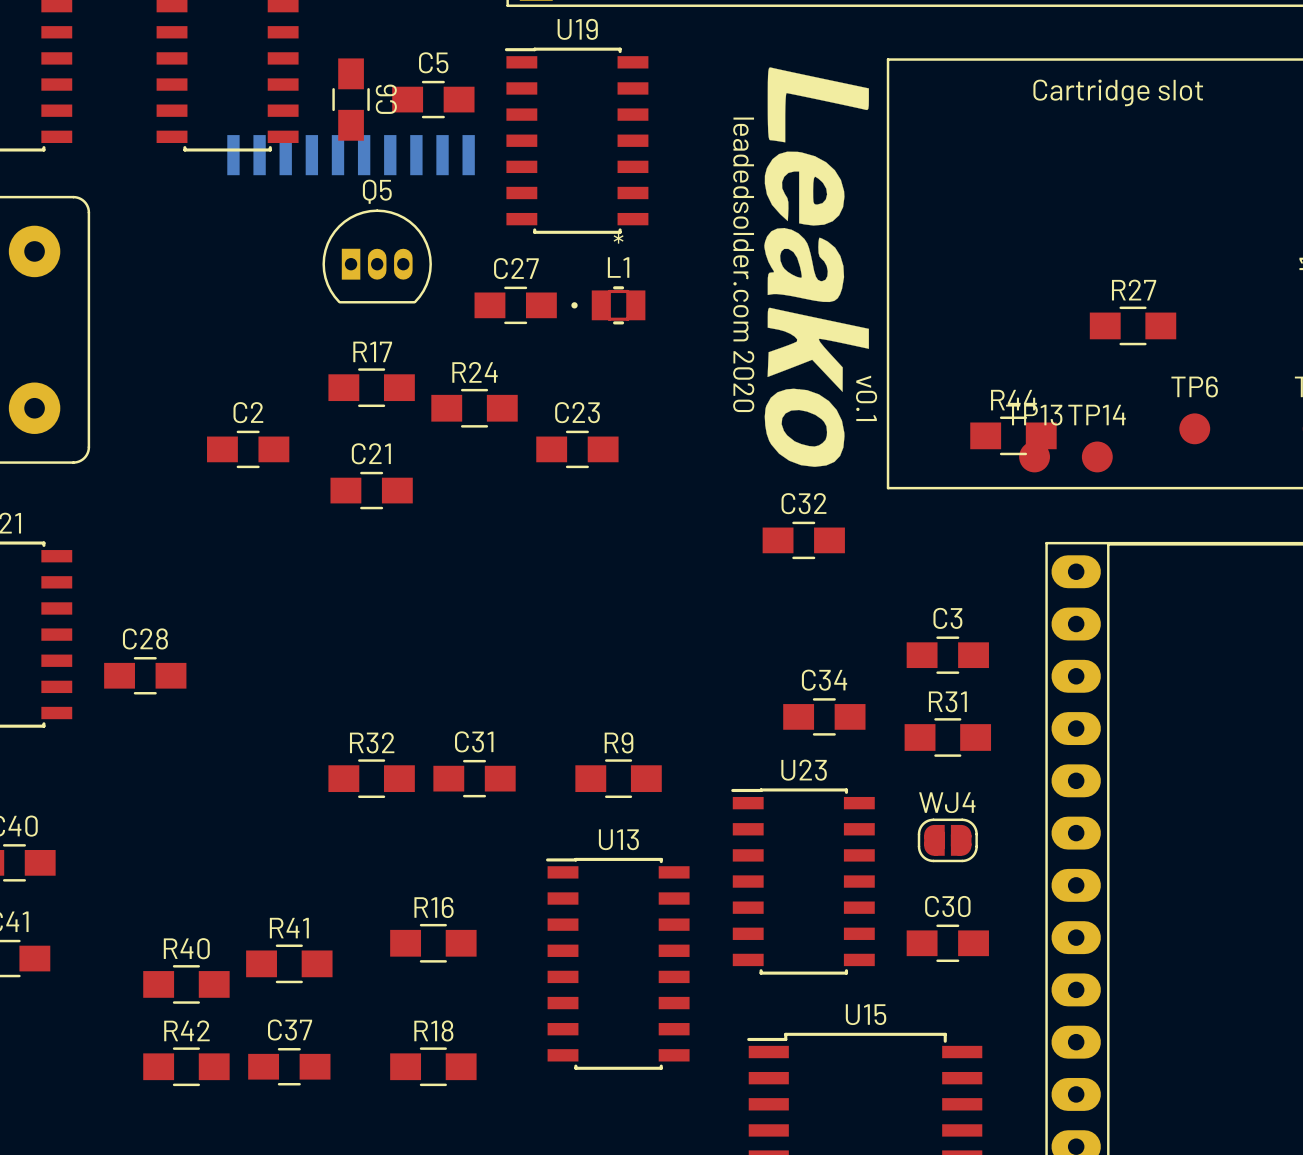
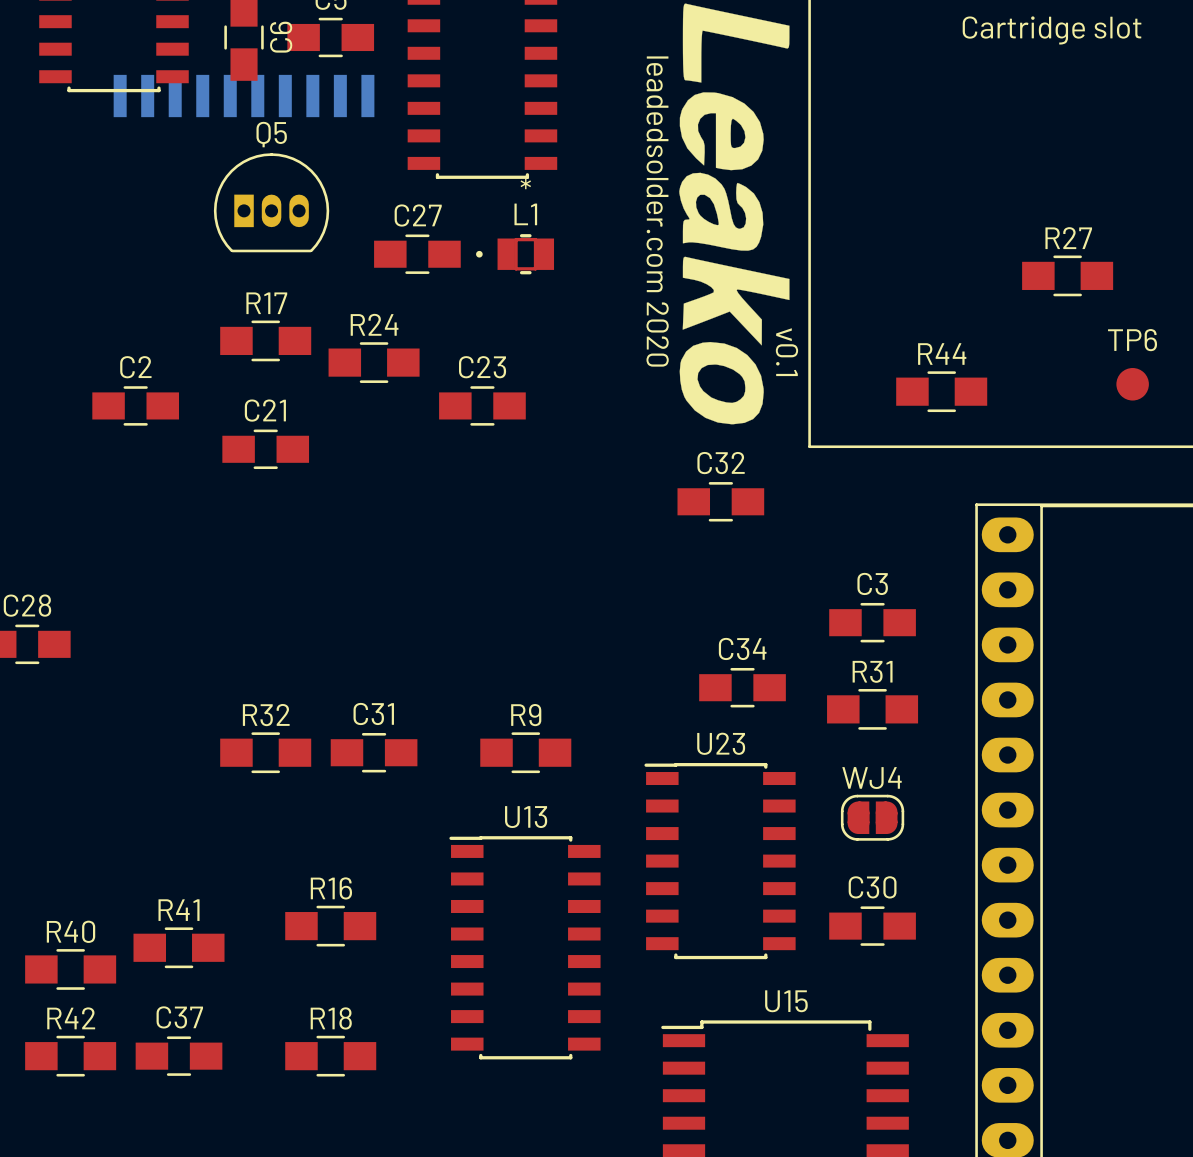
TP13: (1034, 456) -> none
TP14: (1097, 456) -> none

